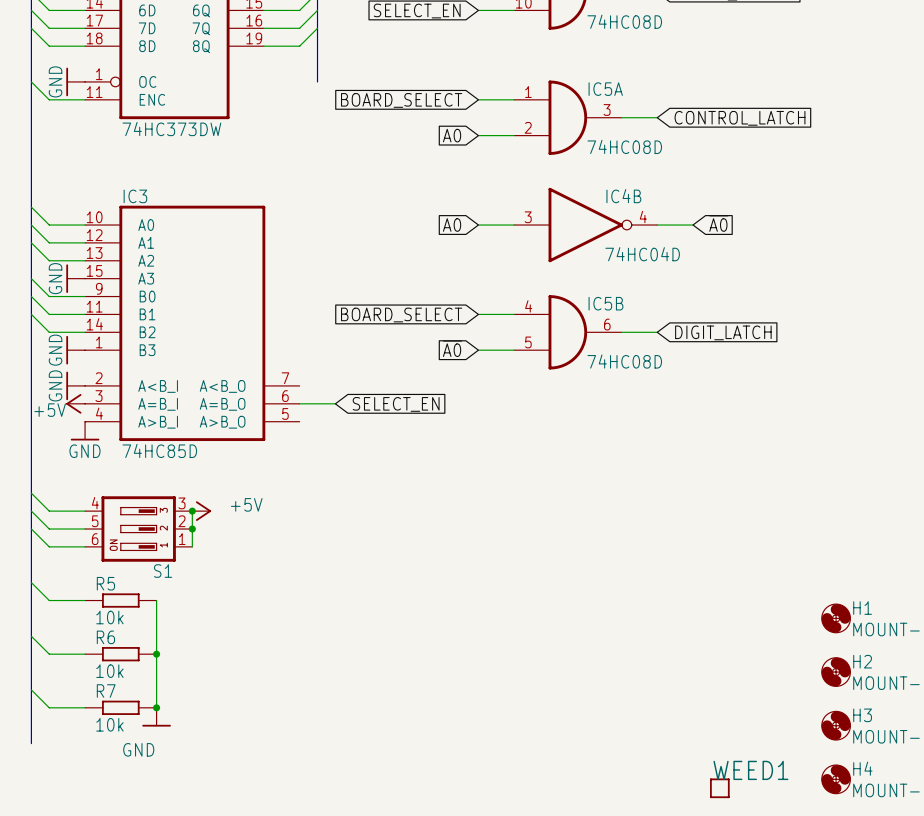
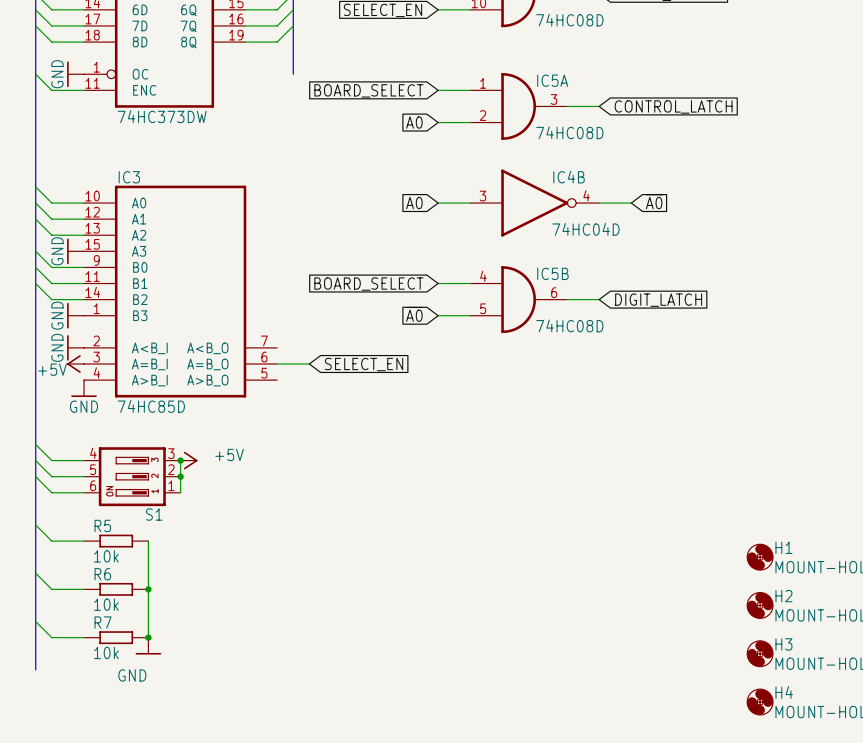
WEED1: (719, 788) -> none

